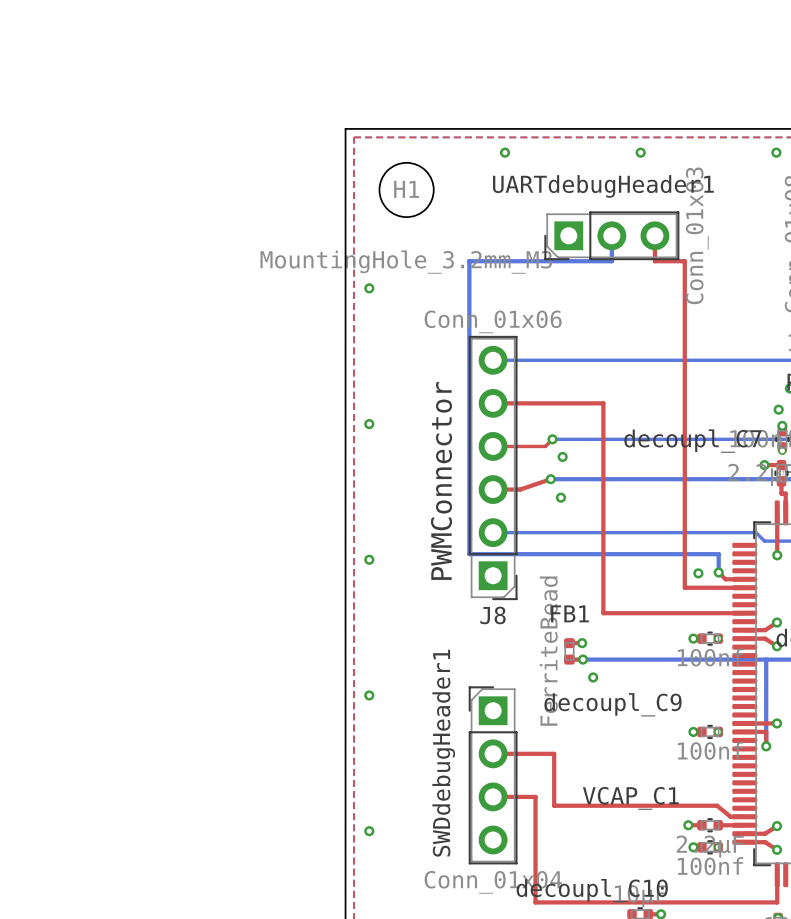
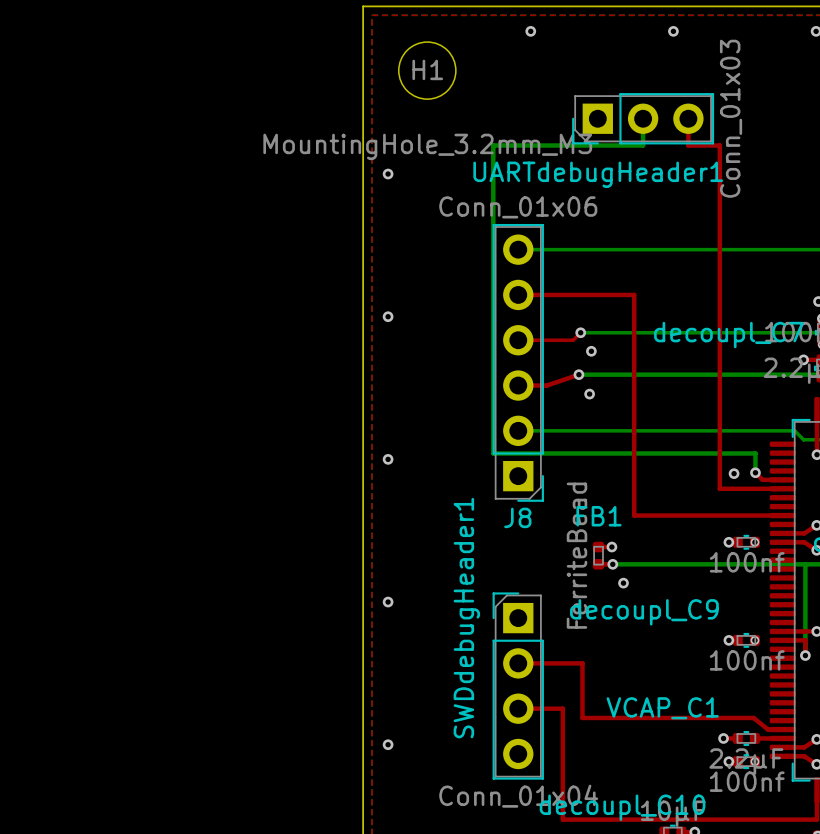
UARTdebugHeader1 name position: UARTdebugHeader1 (603, 186) -> UARTdebugHeader1 (598, 174)
text: PWMConnector (441, 480) -> none
SWDdebugHeader1 name position: SWDdebugHeader1 (443, 753) -> SWDdebugHeader1 (466, 618)

